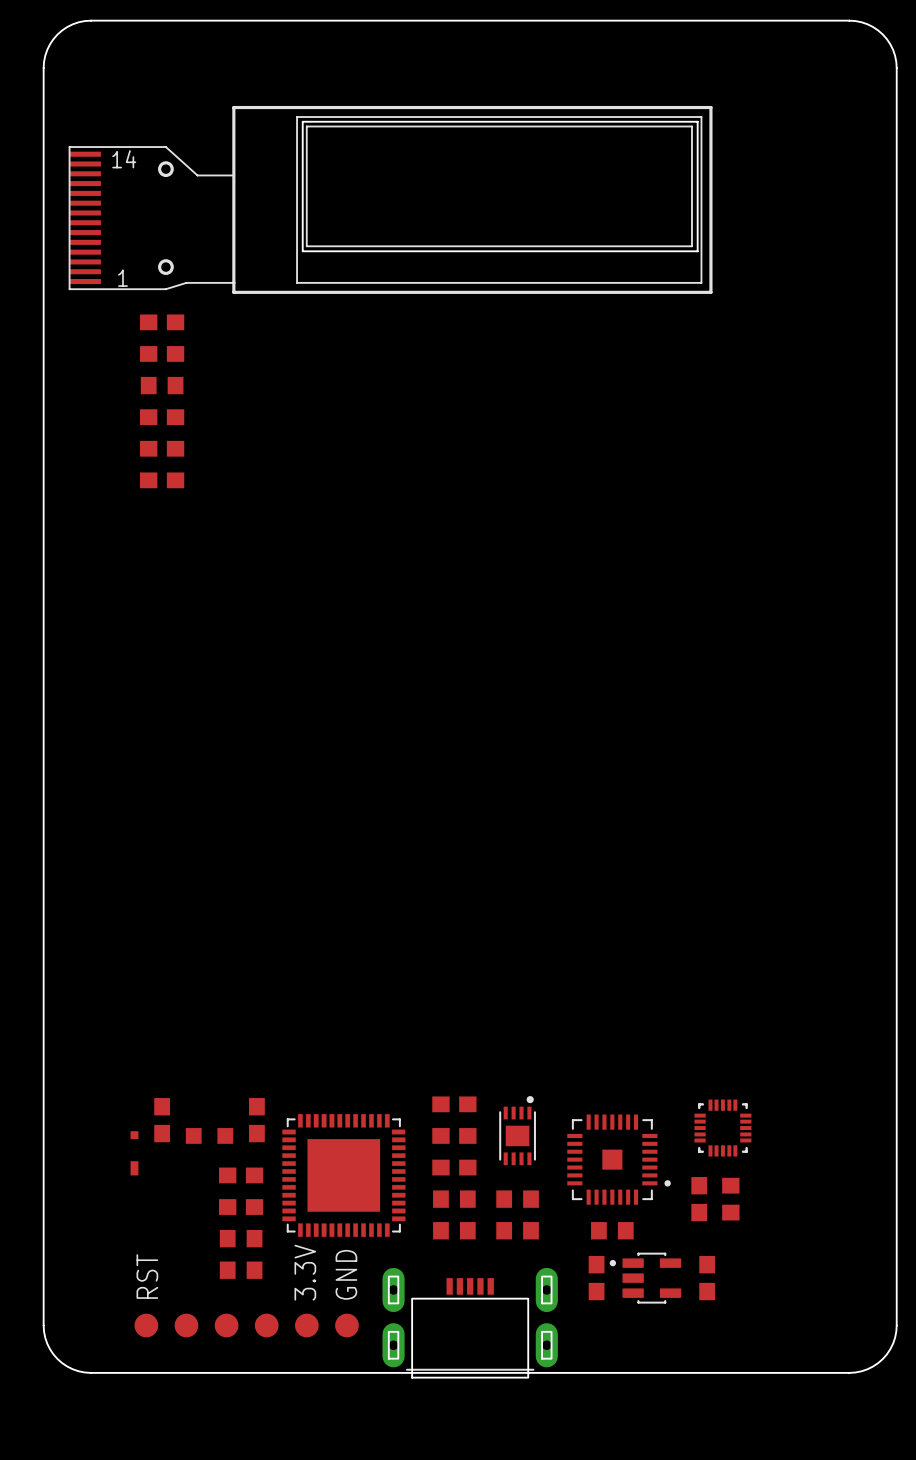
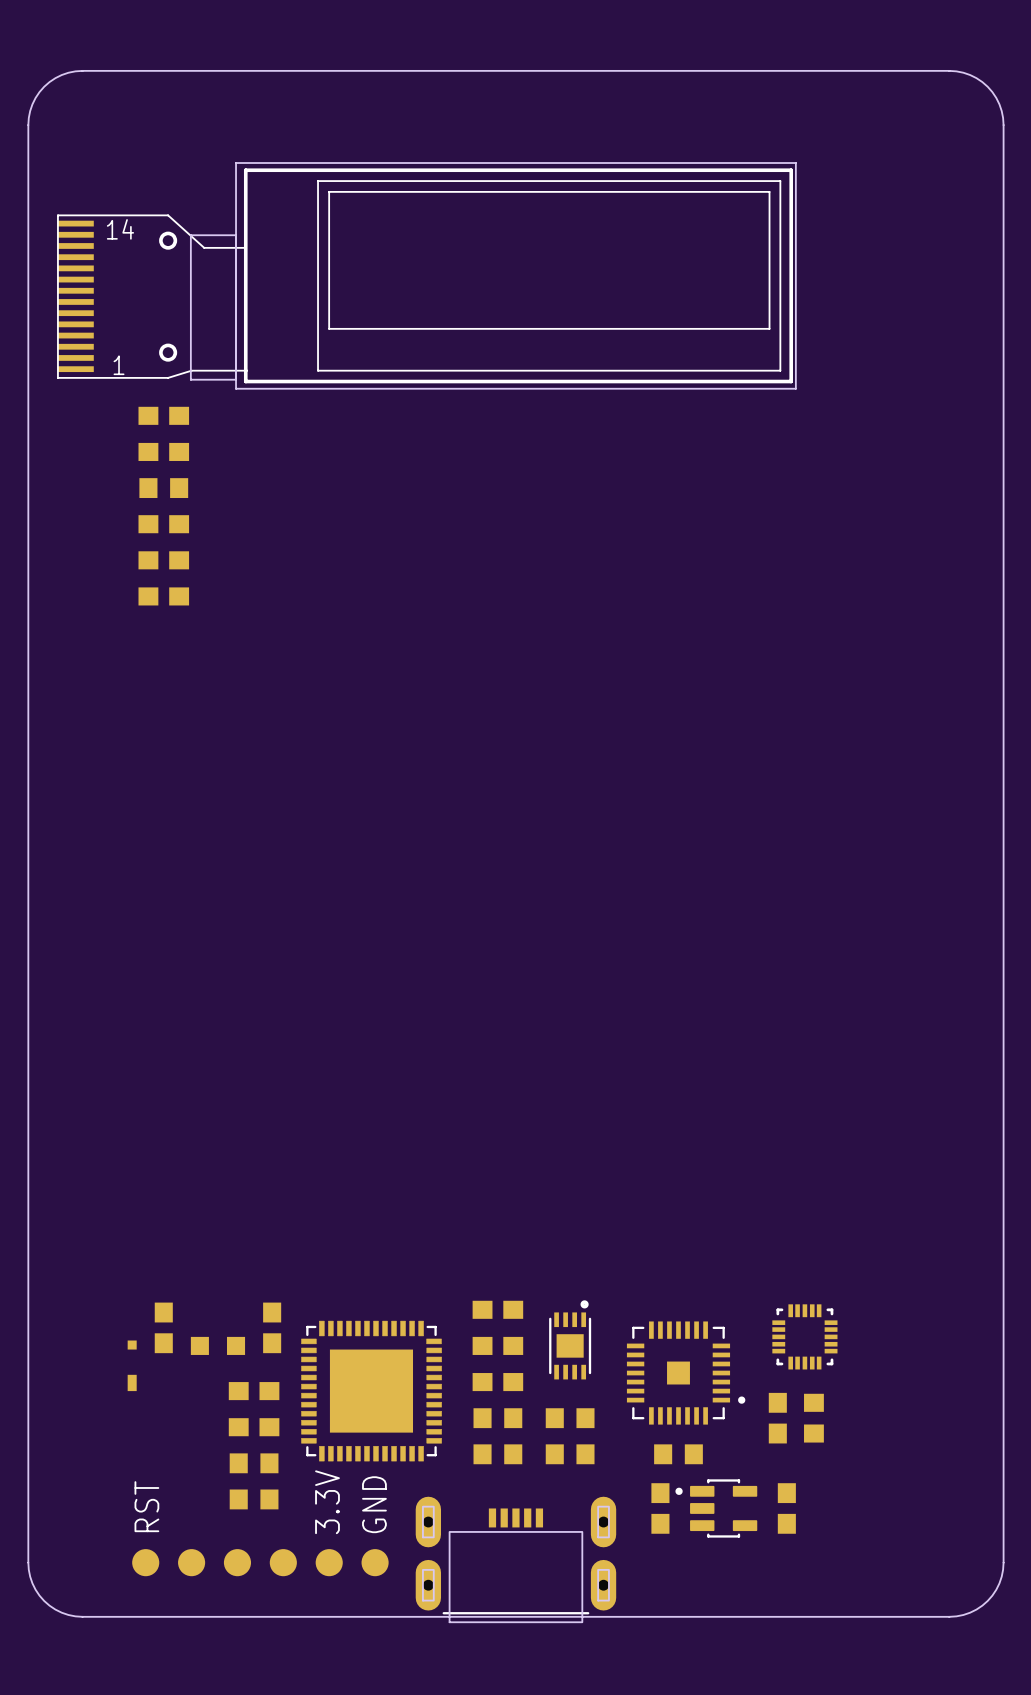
board edge: (302, 121) (697, 121) (697, 251) (302, 251) (302, 121) -> (236, 162) (236, 388) (795, 388) (795, 162) (236, 162)
board edge: none -> (236, 235) (190, 235) (190, 379) (236, 379)

